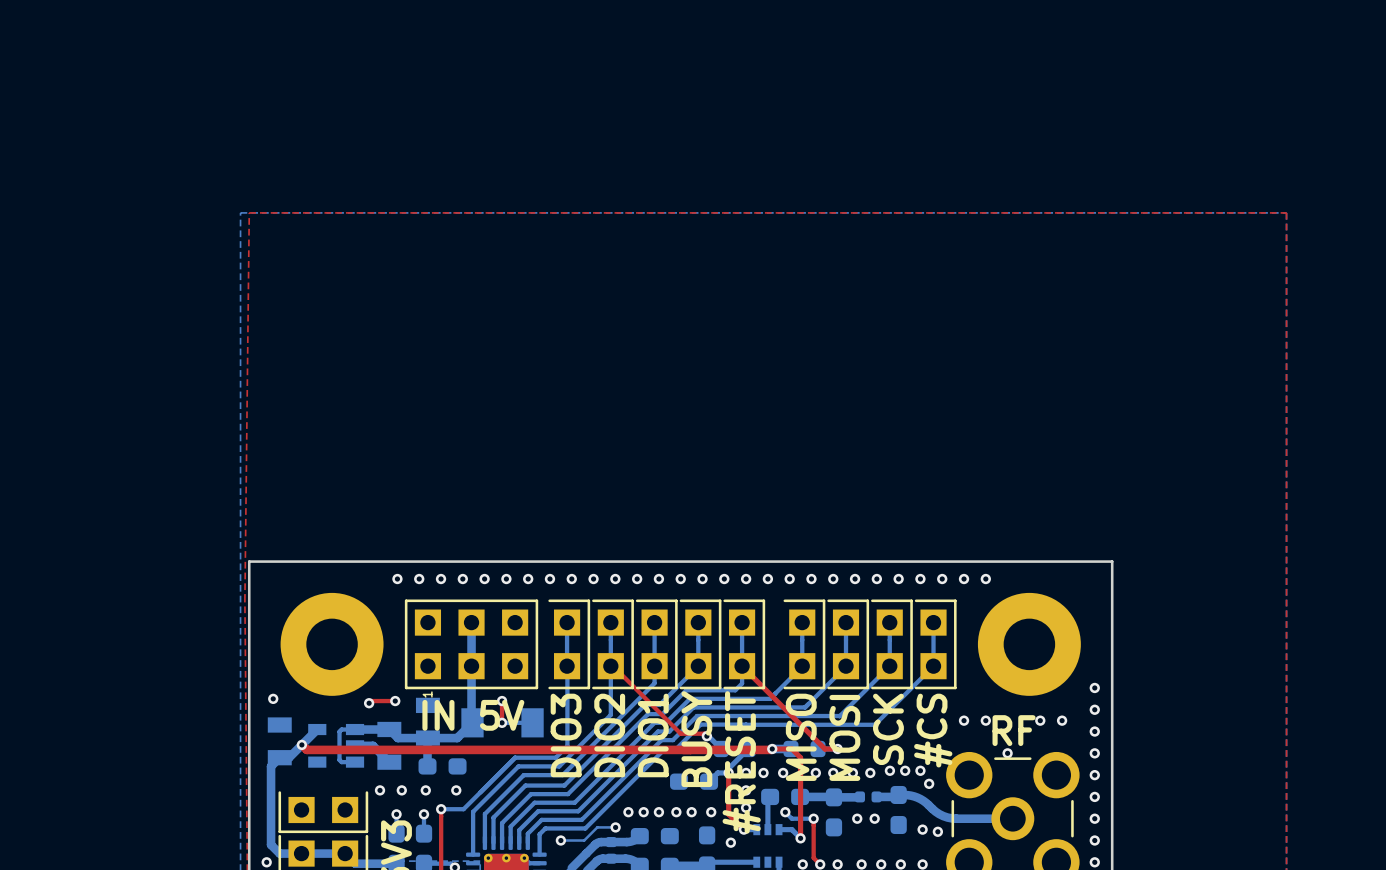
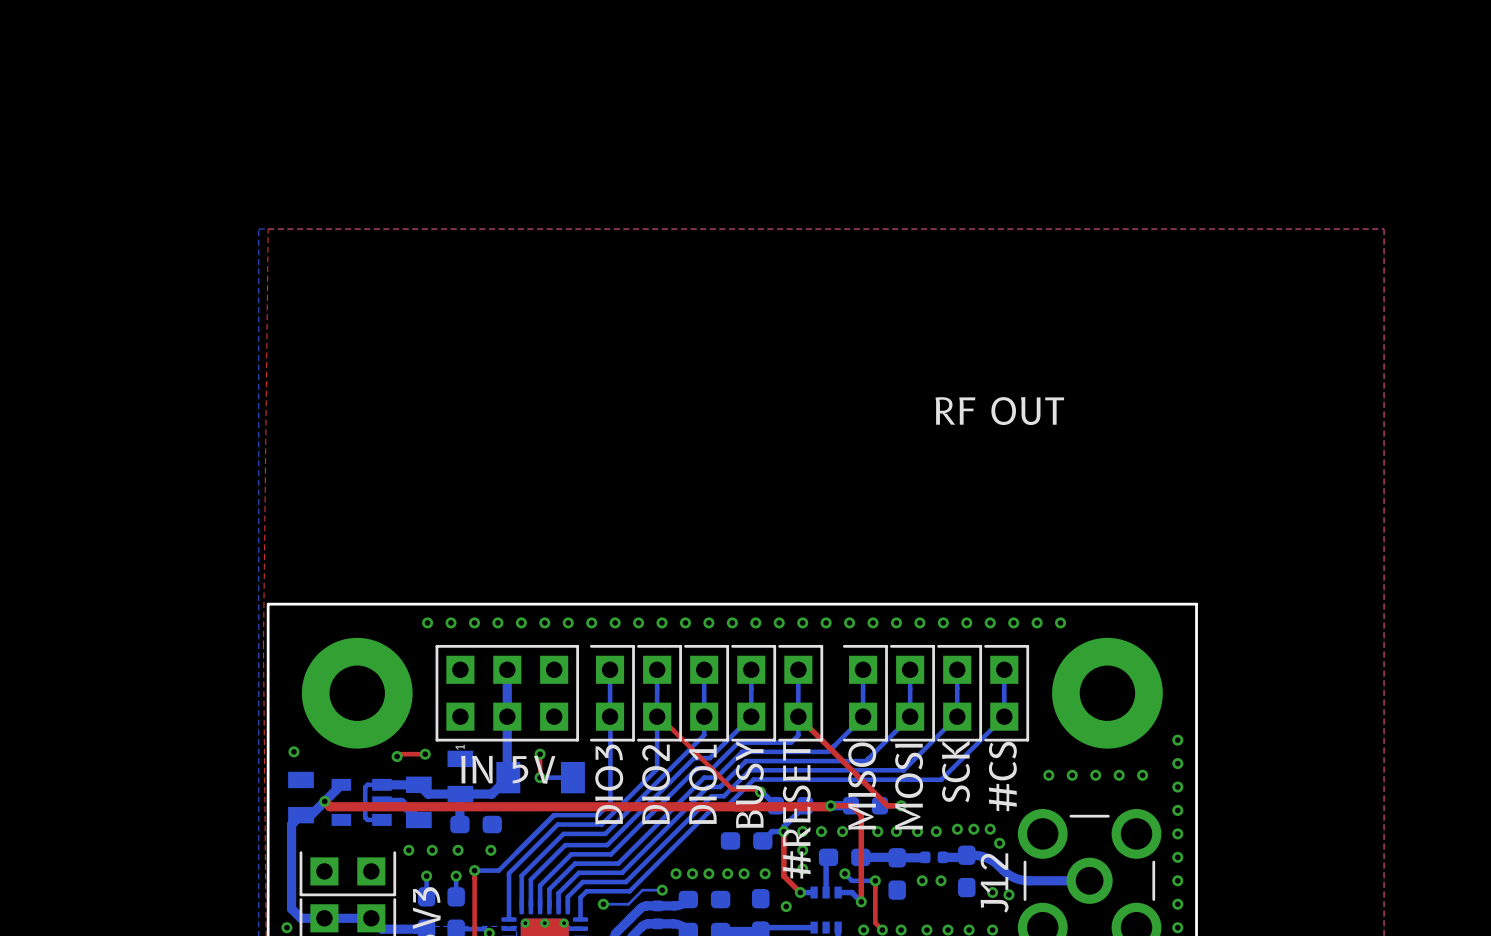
text: none -> RF OUT (999, 411)
via: (964, 720) -> none
via: none -> (1048, 775)
via: (985, 720) -> none
via: none -> (1072, 775)
via: none -> (1095, 775)
text: RF (1014, 730) -> none
via: (1007, 753) -> none
J12 name: none -> J12 (994, 883)

